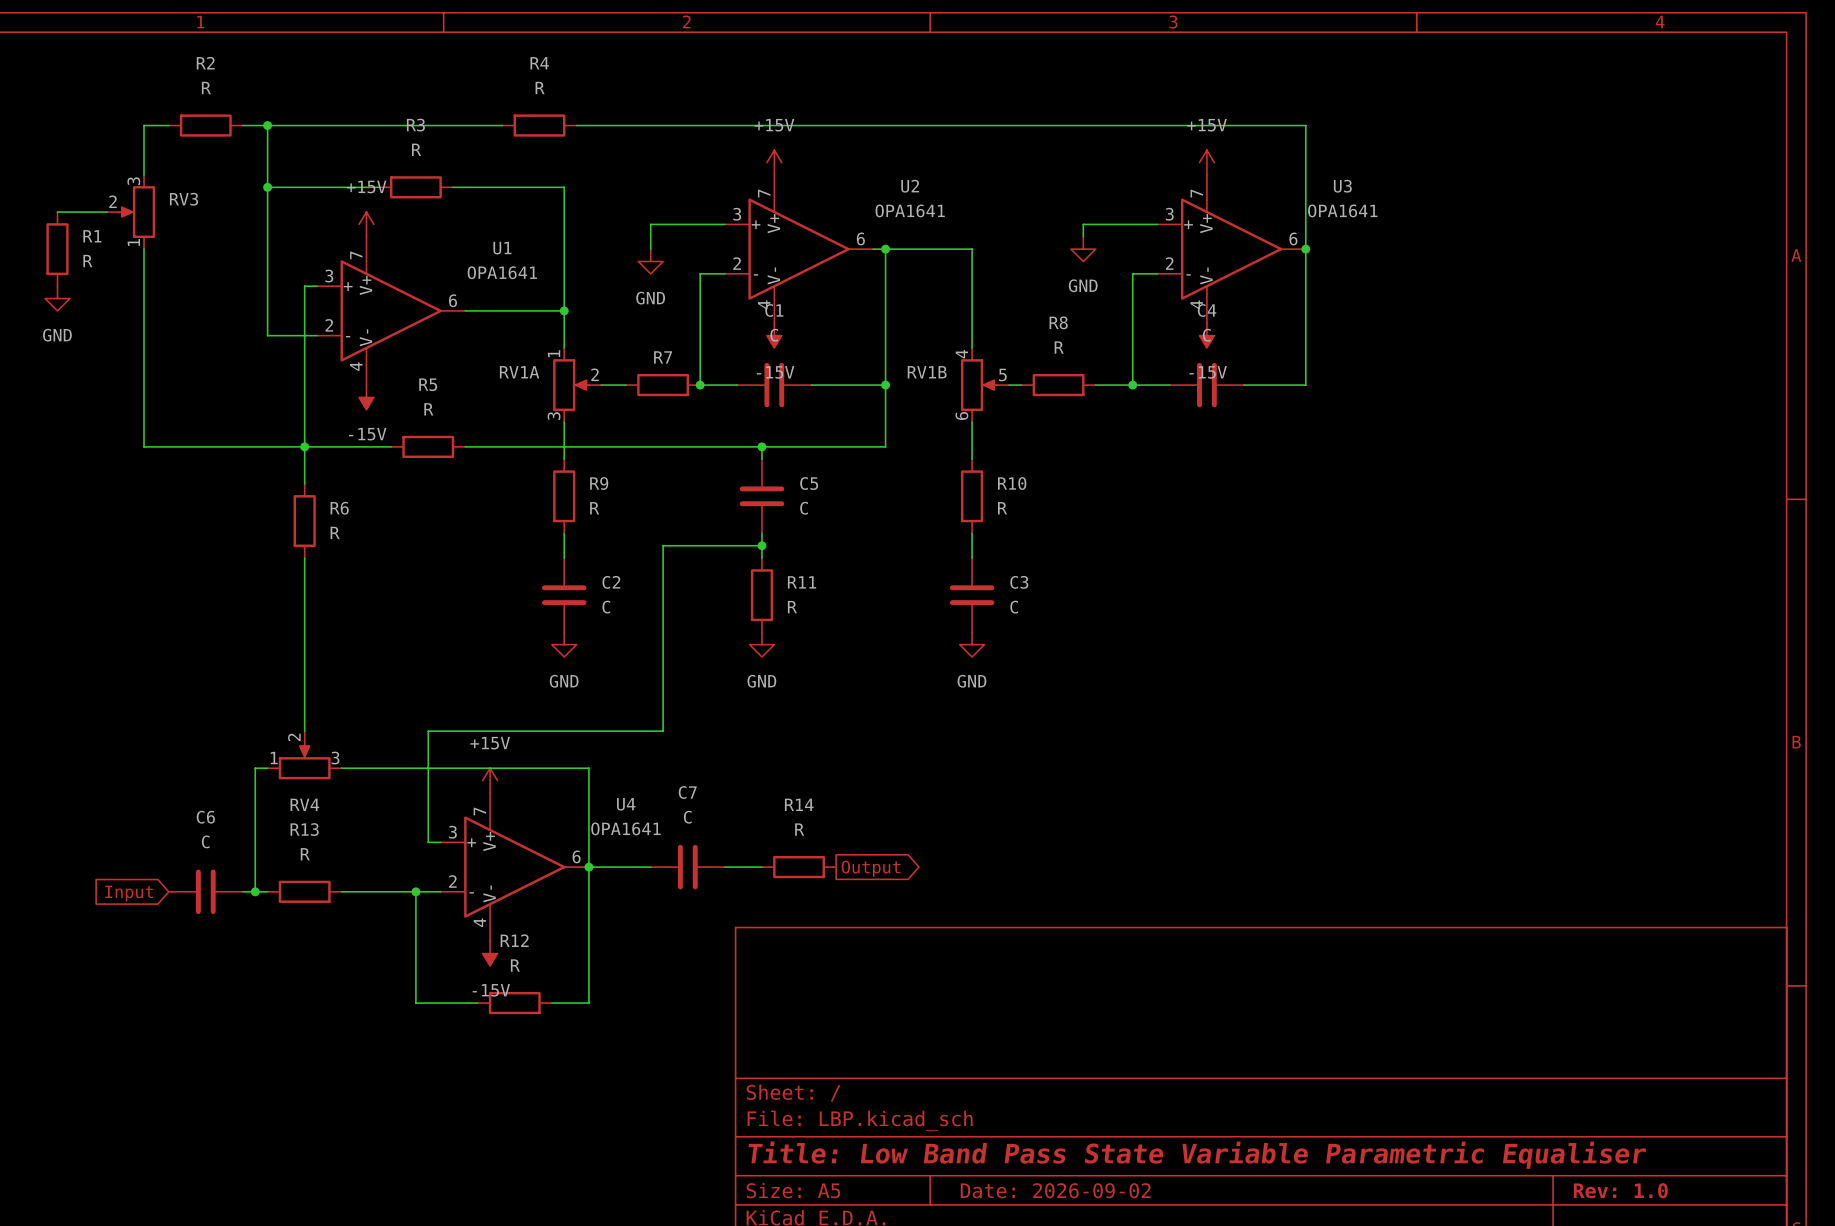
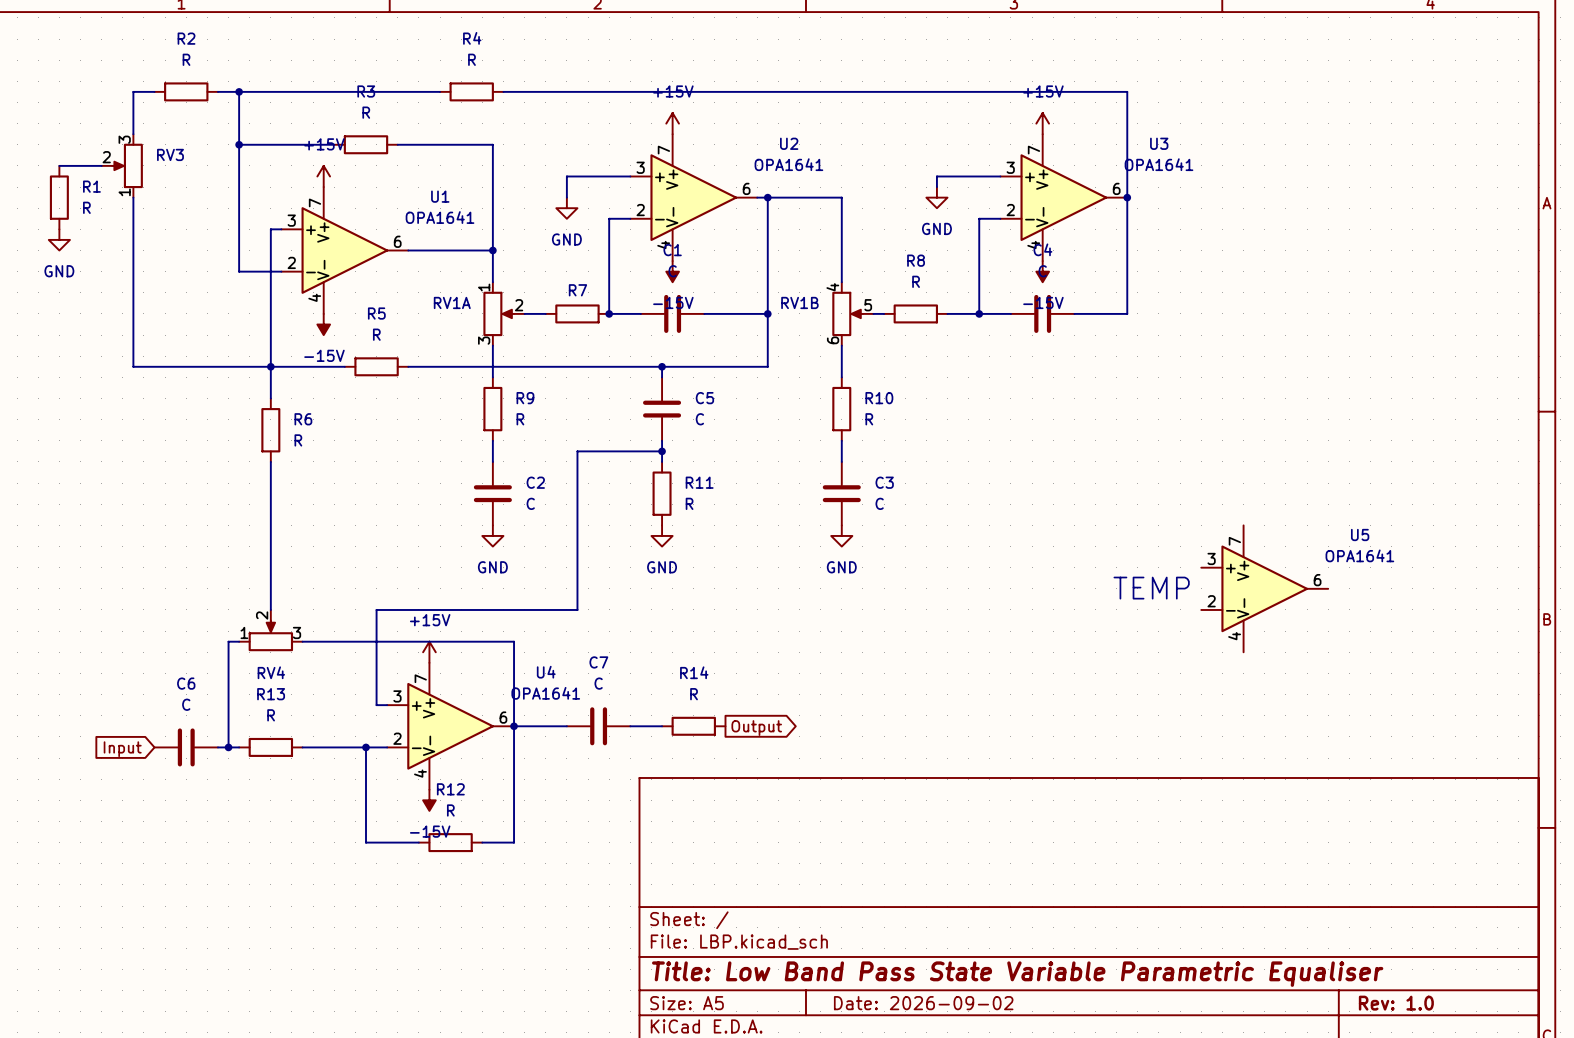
text: none -> TEMP (1151, 588)
U5: none -> OPA1641 (1264, 588)

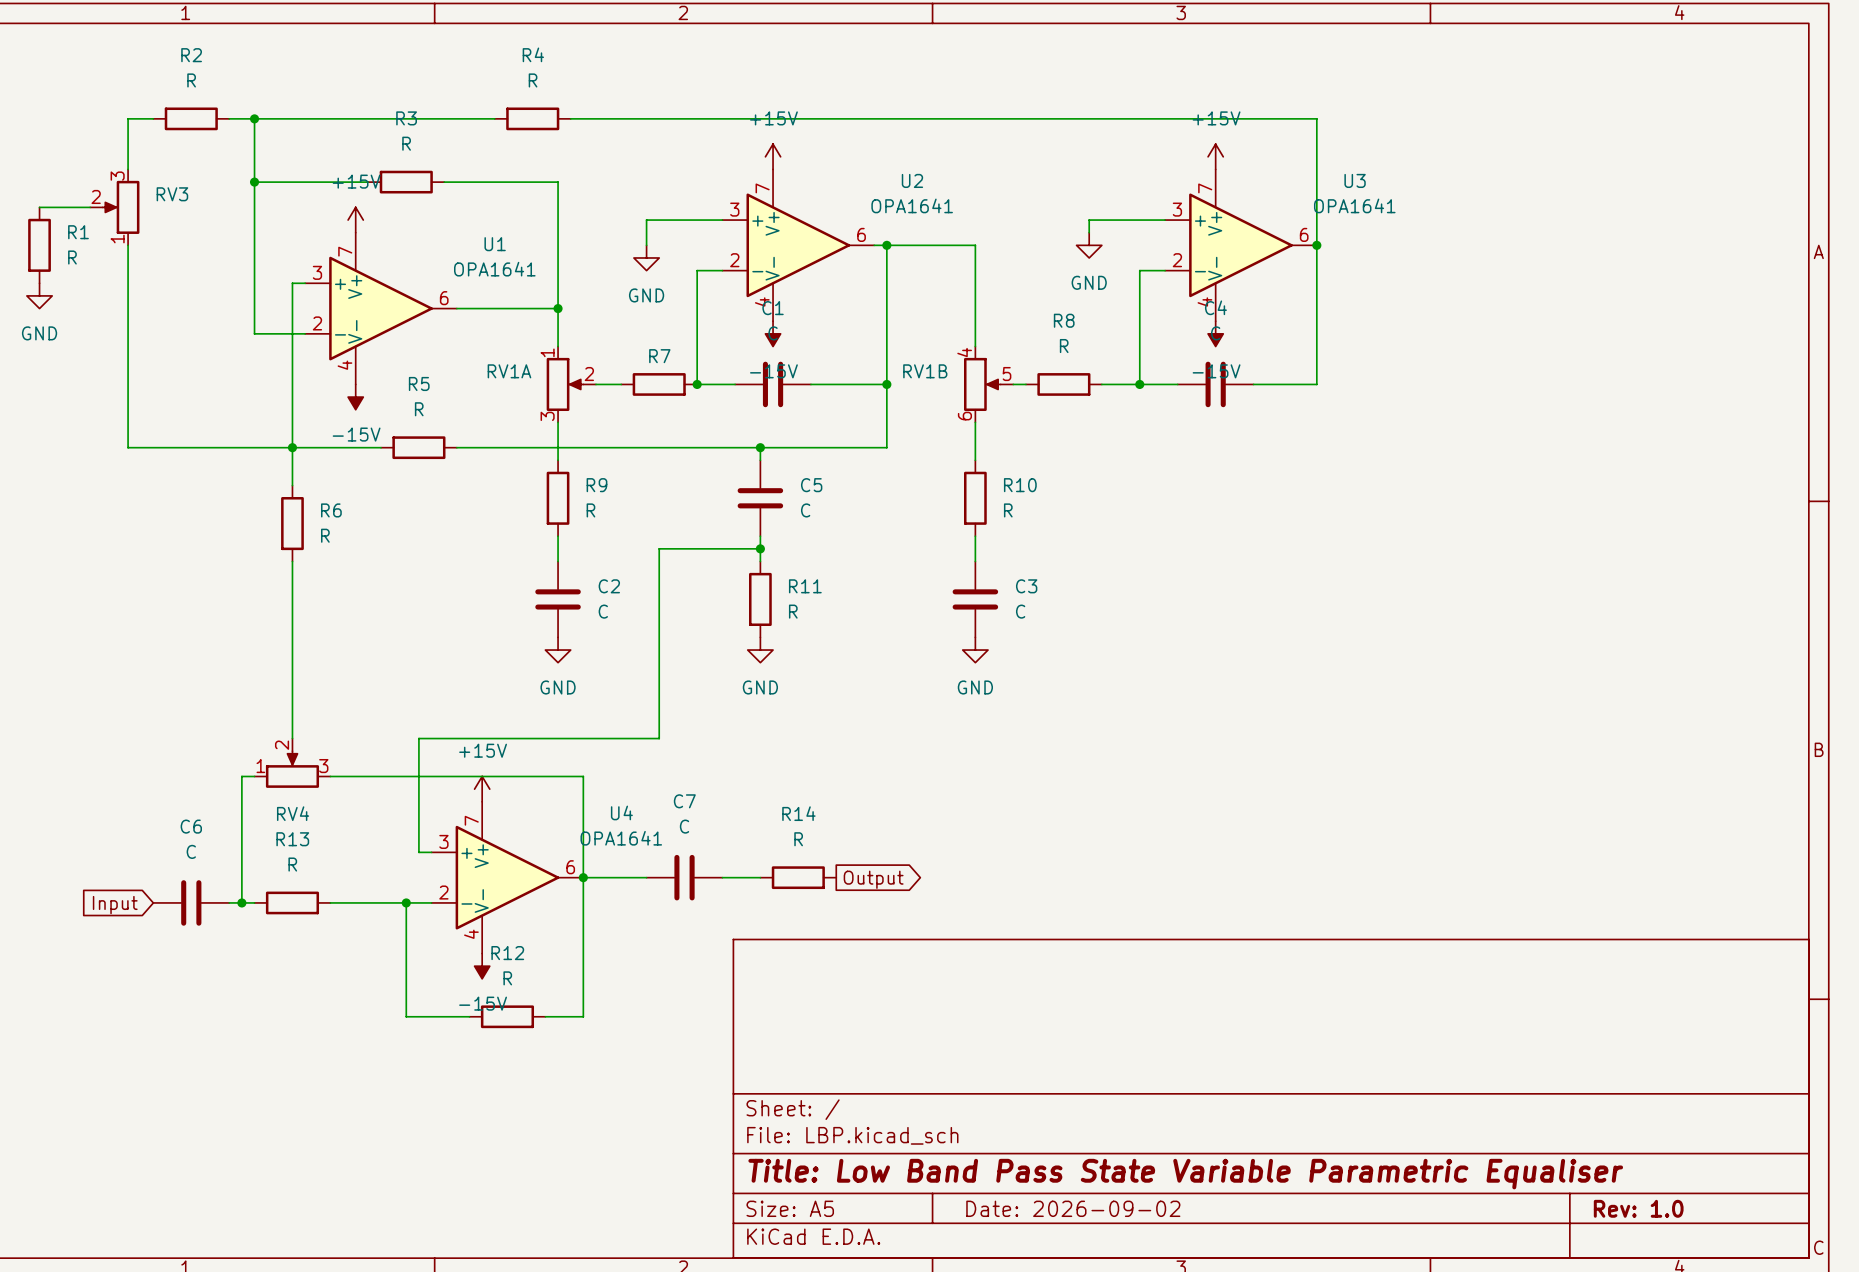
text: TEMP (1151, 588) -> none
U5: OPA1641 (1264, 588) -> none

